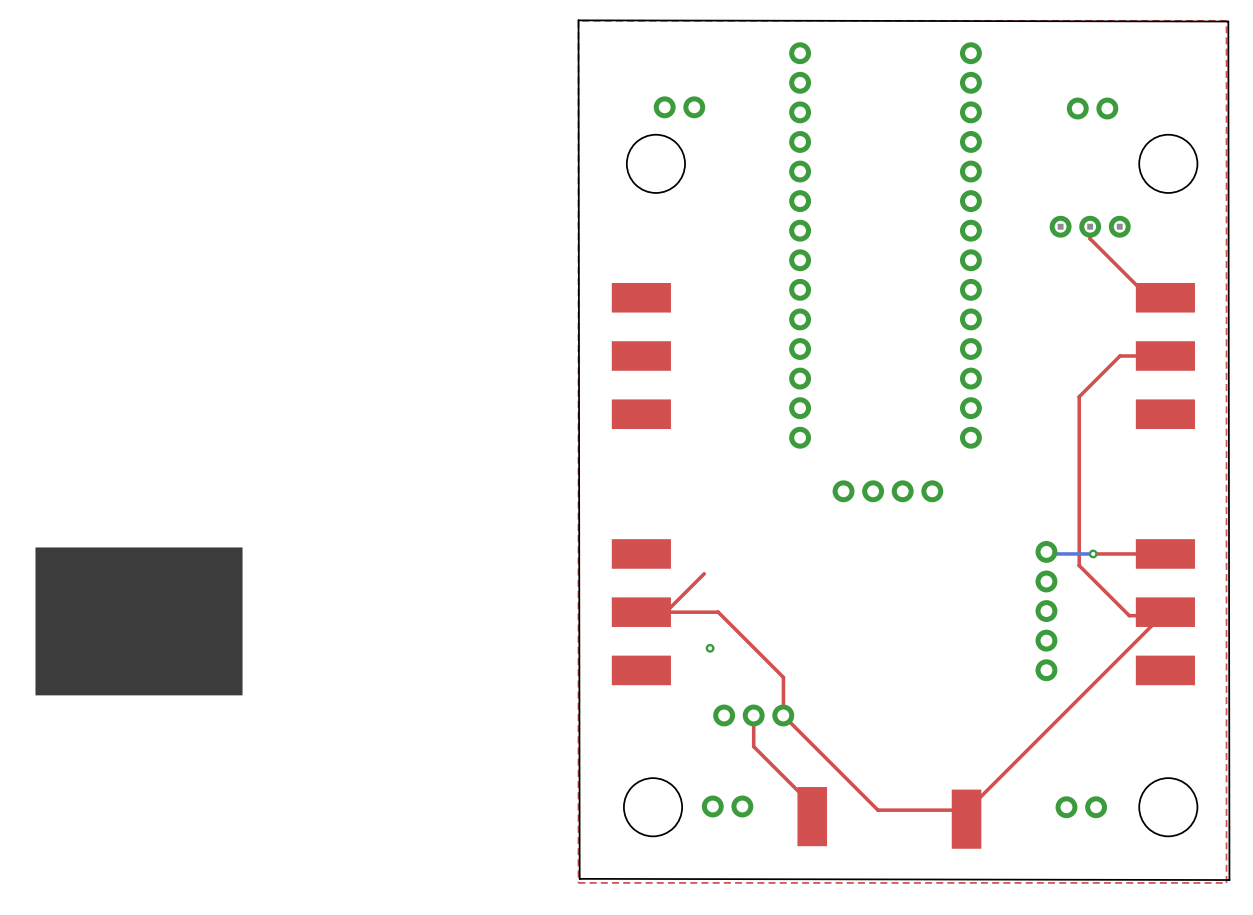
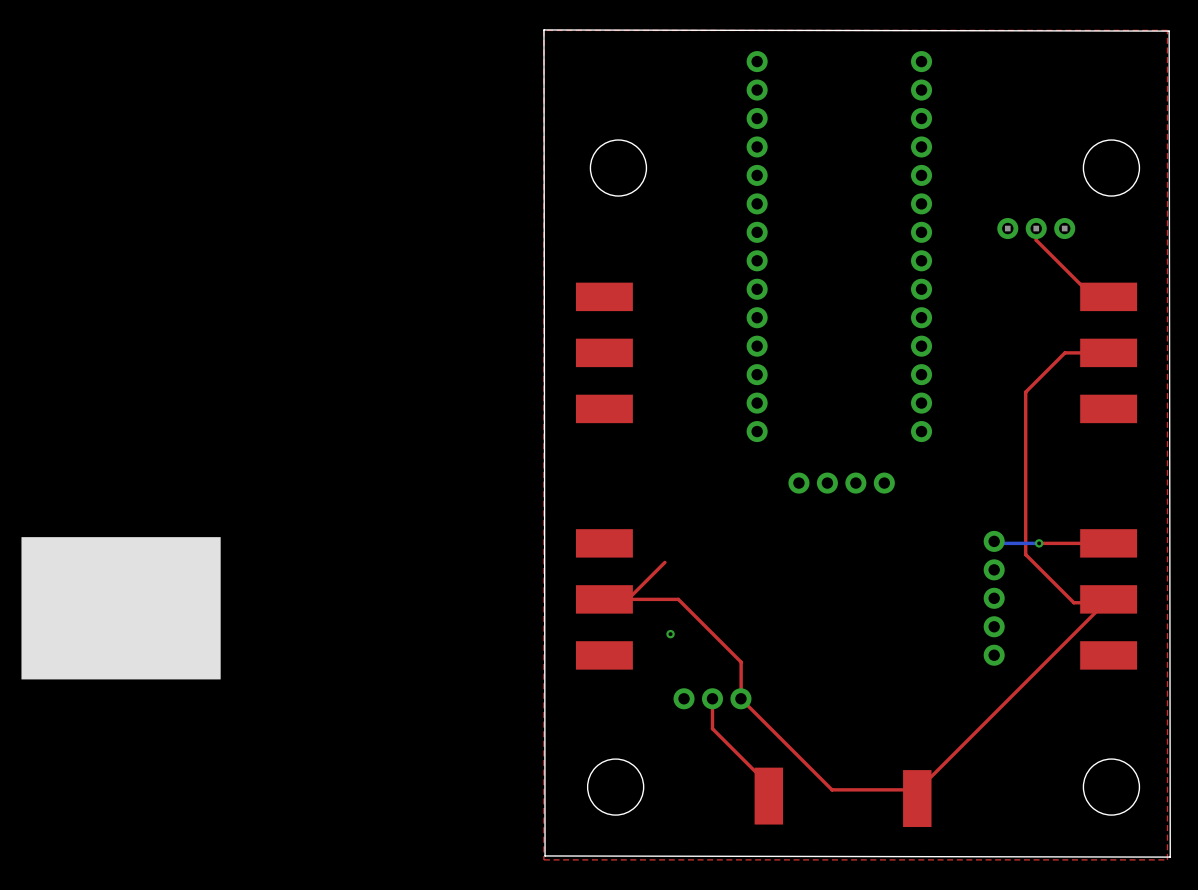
part: (679, 107) -> none
part: (1092, 108) -> none
part: (727, 806) -> none
part: (1081, 807) -> none

